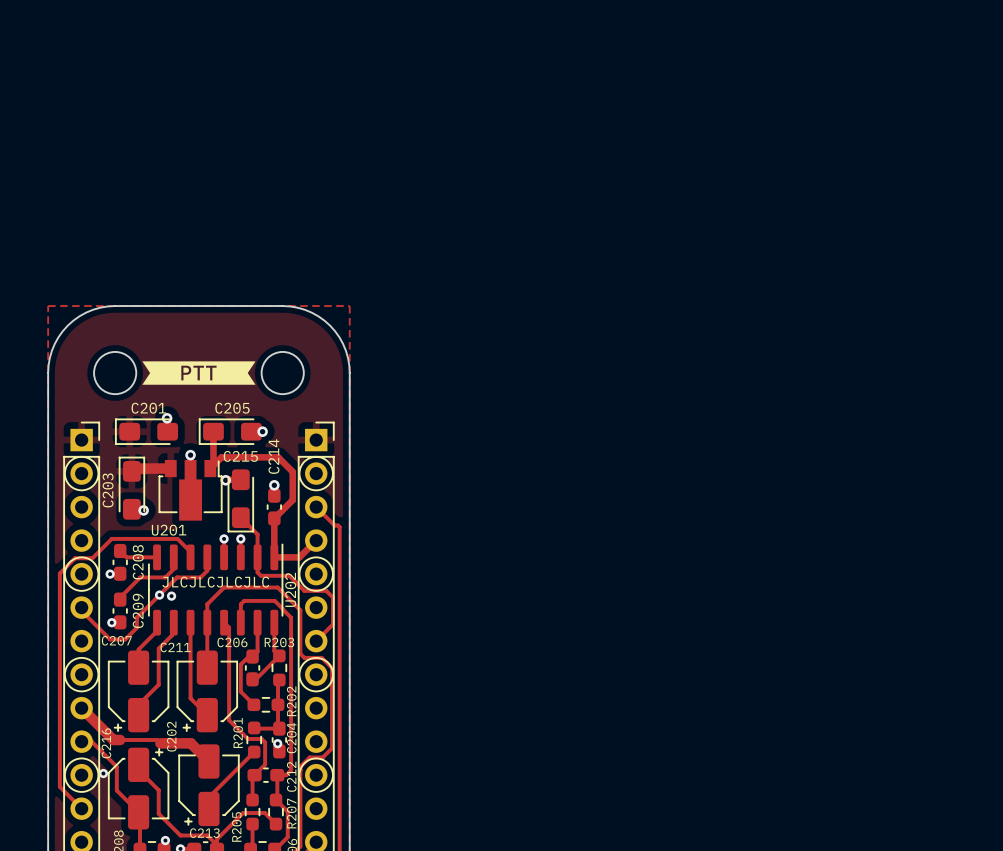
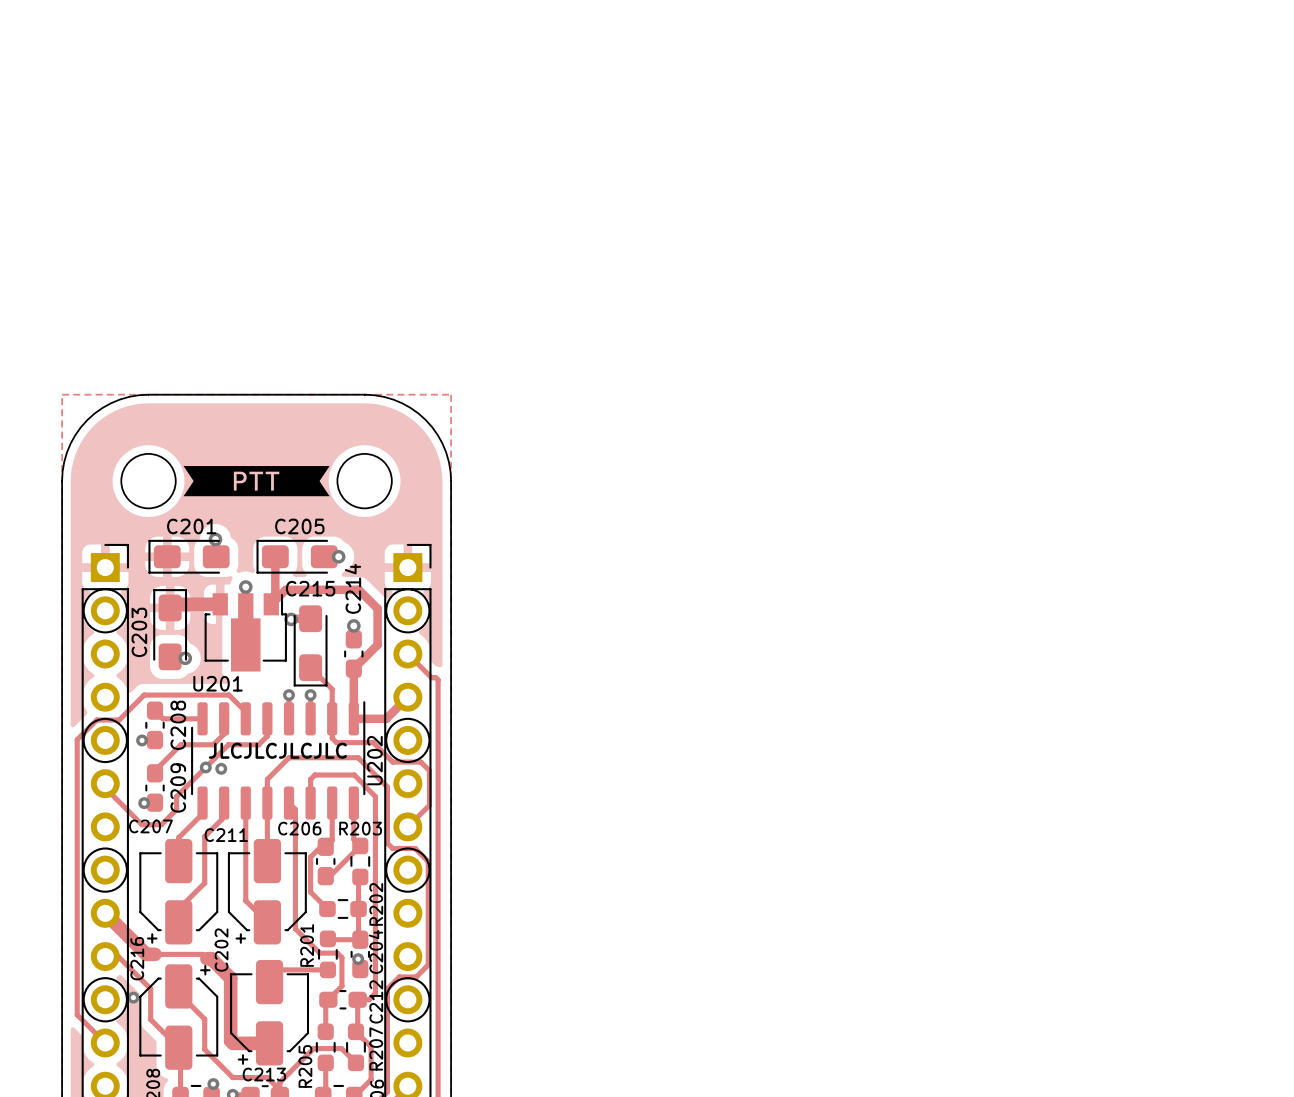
track: (163, 743) (190, 743) (208, 761) -> (211, 958) (230, 978) (230, 1040) (233, 1043) (269, 1043)
track: (254, 752) (208, 797) (208, 808) -> (327, 969) (281, 969) (269, 982)

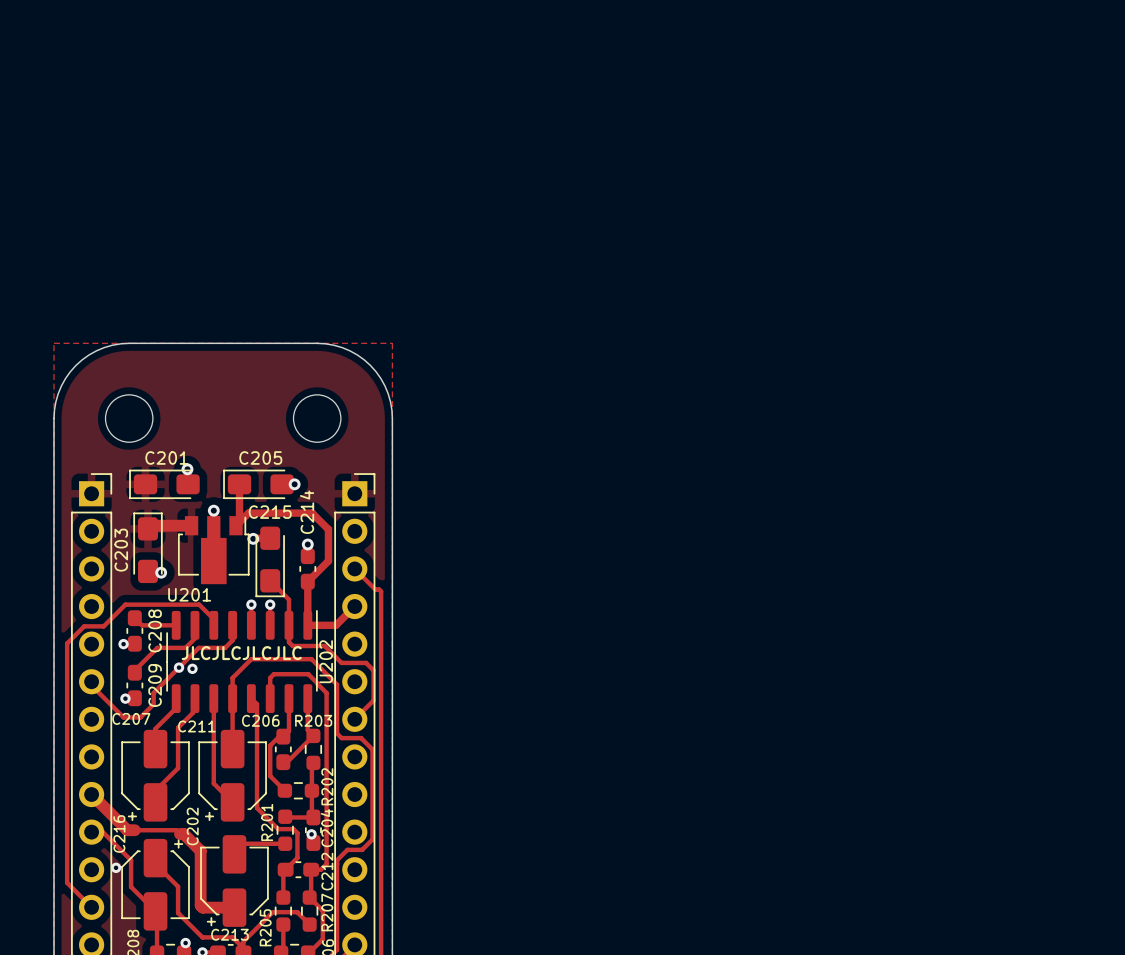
drawing: [183, 466, 330, 497] -> none
drawing: [82, 588, 128, 634] -> none
drawing: [385, 588, 431, 634] -> none
drawing: [82, 717, 128, 764] -> none
drawing: [385, 717, 431, 764] -> none
drawing: [82, 847, 128, 893] -> none
drawing: [385, 847, 431, 893] -> none
drawing: [82, 977, 128, 1023] -> none
drawing: [385, 977, 431, 1023] -> none

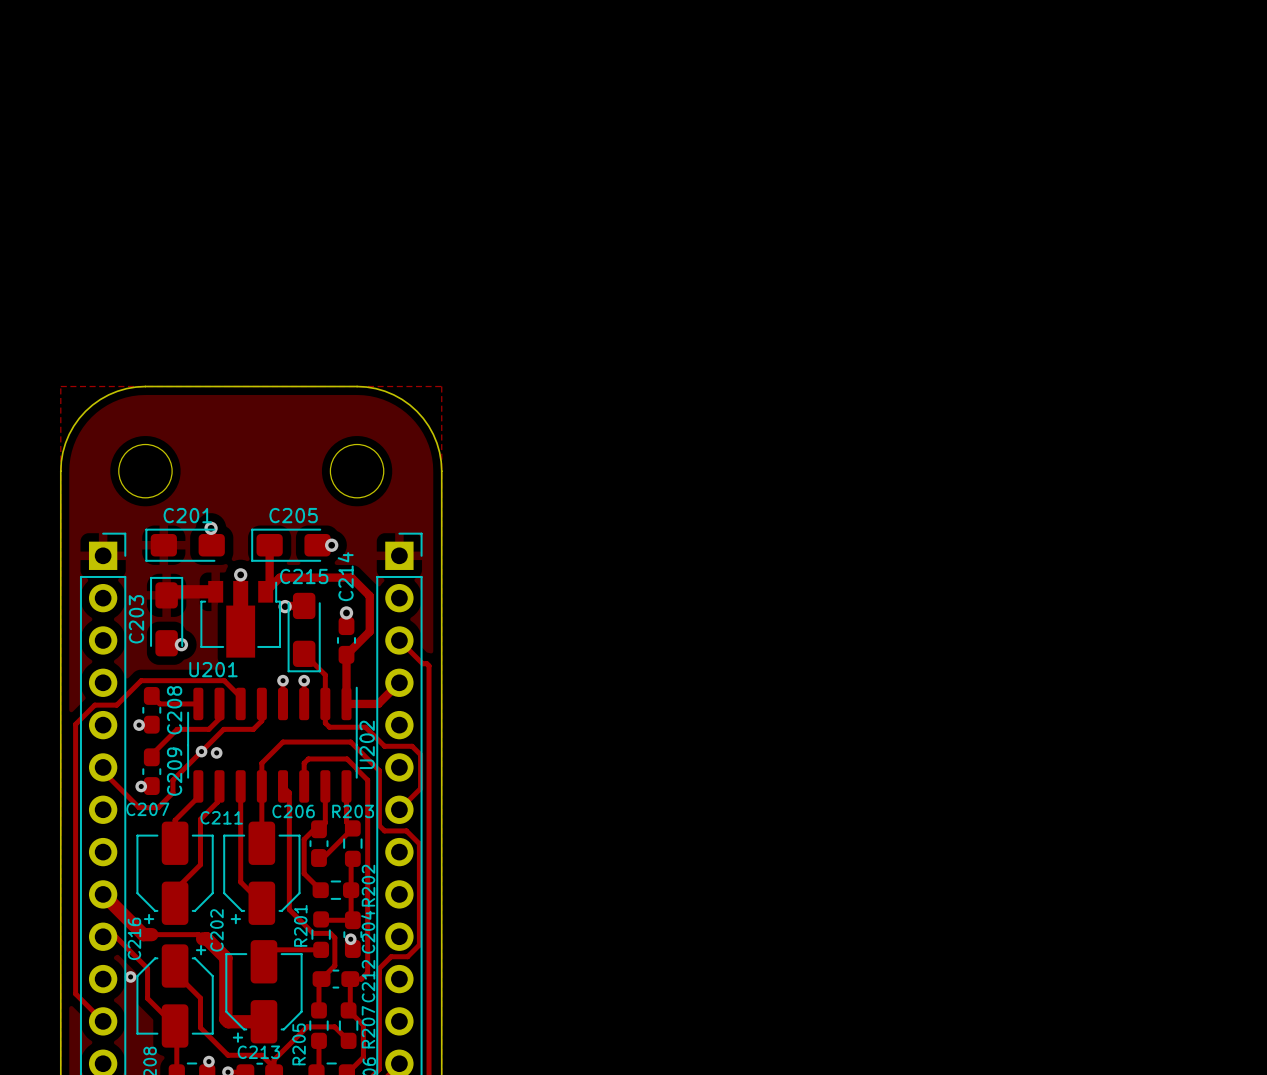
text: JLCJLCJLCJLC (241, 653) -> none

